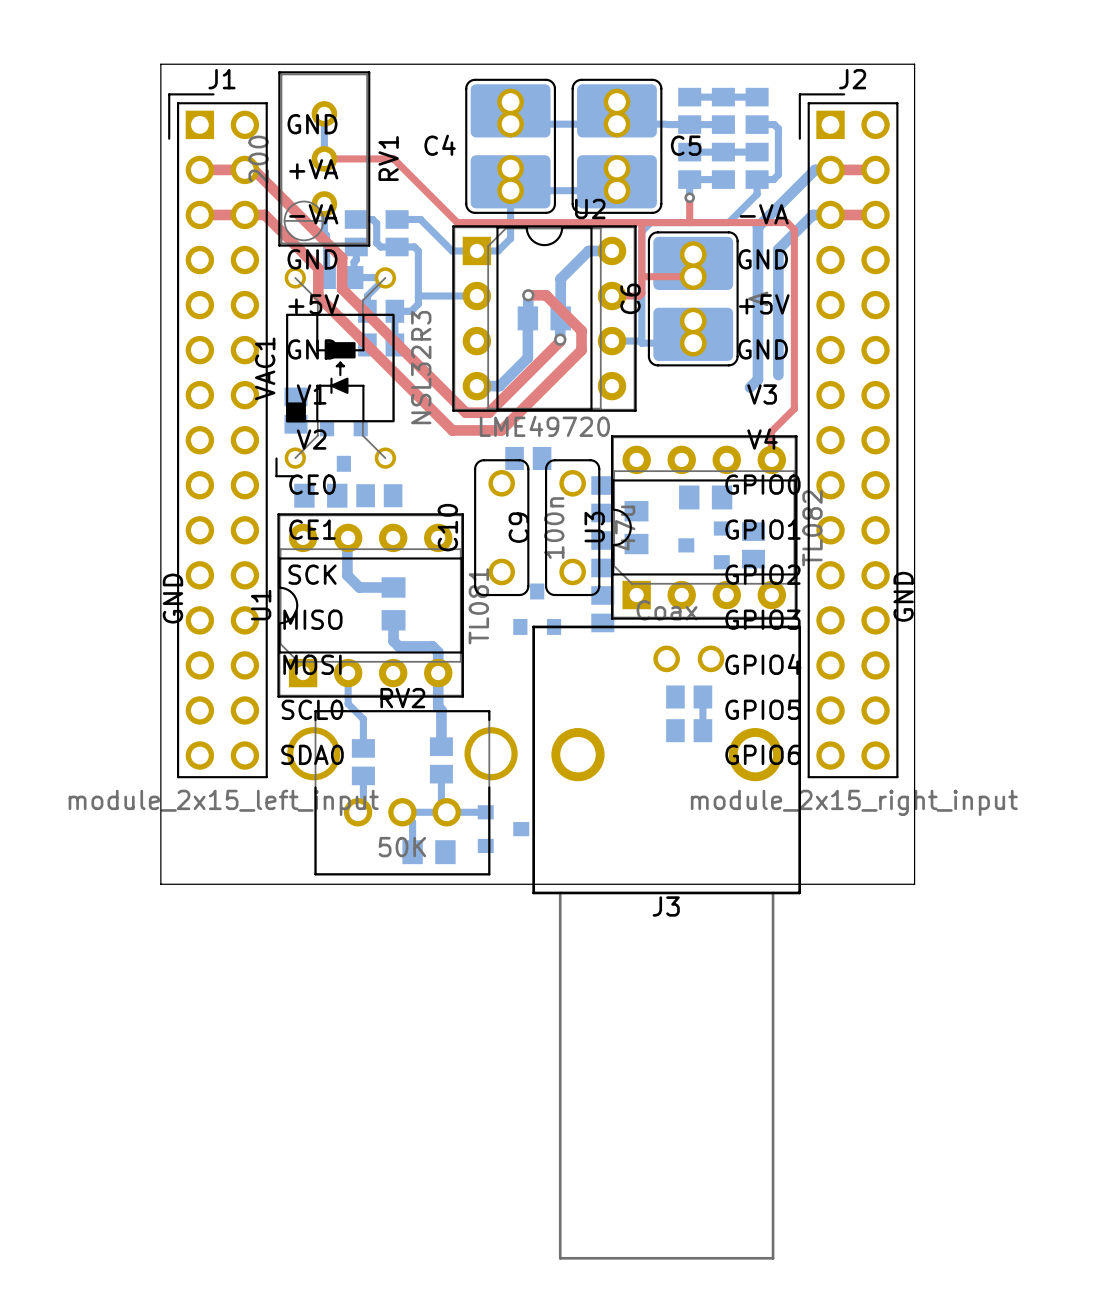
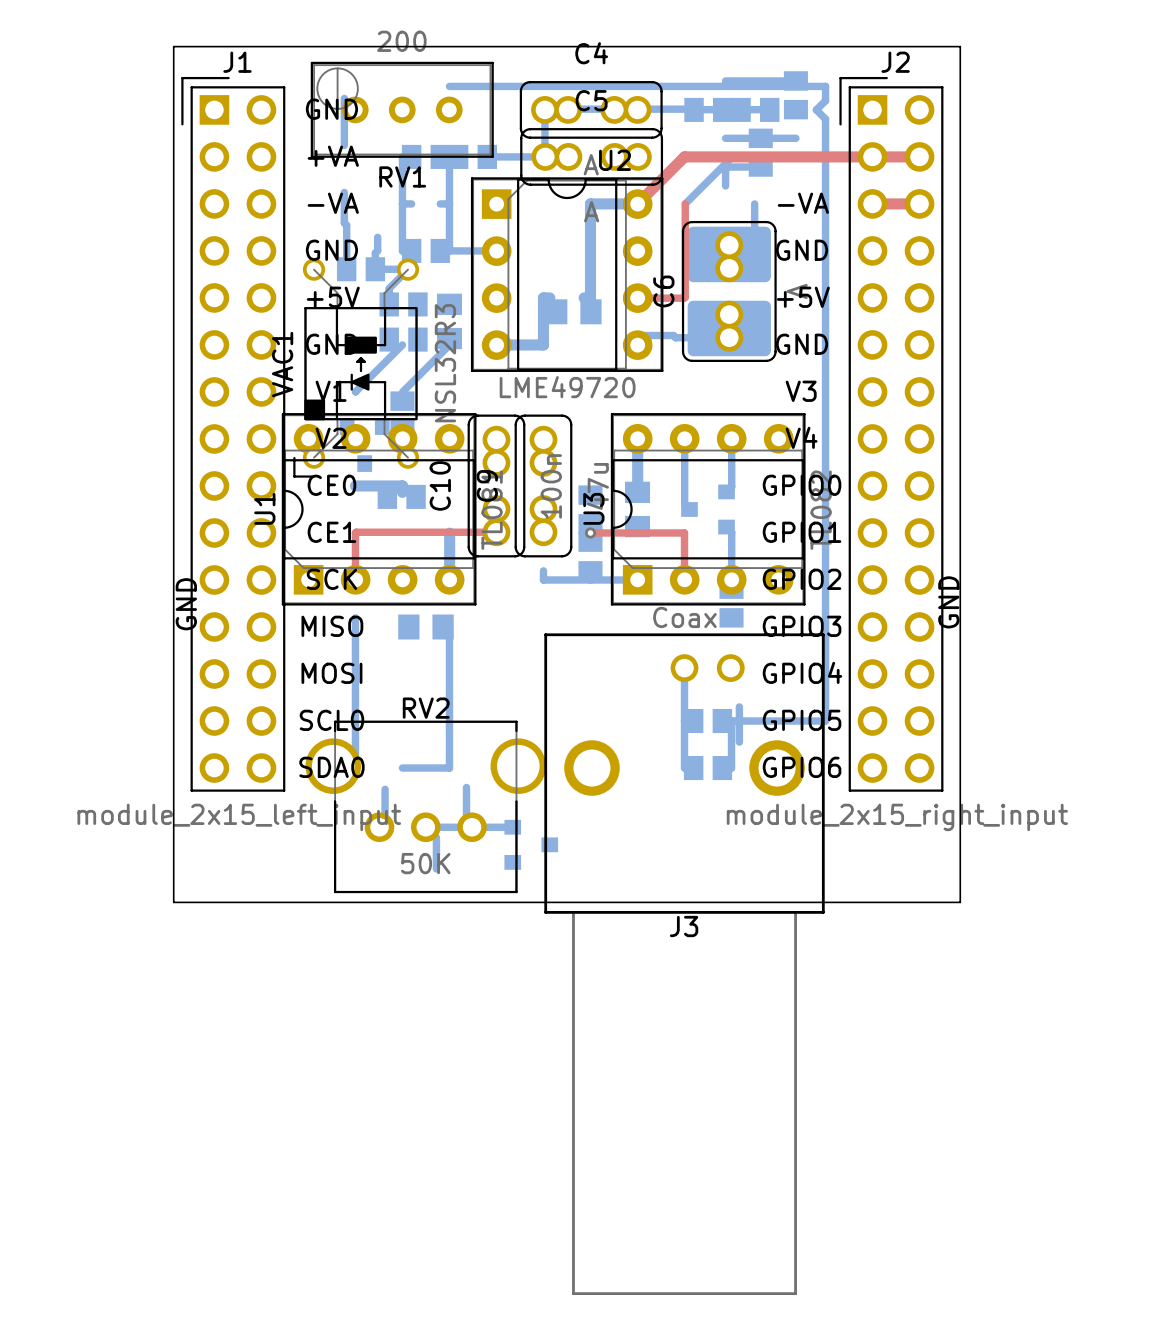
C4 footprint: [465, 78, 556, 214] -> [519, 81, 663, 139]
C5 footprint: [571, 78, 663, 214] -> [520, 128, 664, 186]
bottom track: none -> (449, 86) (825, 86) (825, 100) (816, 109) (825, 119) (825, 721) (722, 721)
part rotation: 0° (689, 110) -> 90° clockwise (708, 109)
part rotation: 0° (723, 110) -> 90° clockwise (755, 109)
bottom track: none -> (544, 109) (545, 156) (487, 156)
bottom track: (757, 124) (774, 124) (778, 128) (778, 174) (773, 179) (757, 179) (757, 194) (728, 222) (650, 222) (641, 231) (641, 343) -> none
C4 name position: C4 (440, 145) -> C4 (591, 53)
C5 name position: C5 (686, 145) -> C5 (591, 100)
top track: (324, 158) (393, 158) (457, 222) (787, 222) (794, 229) (794, 408) (771, 431) (771, 459) -> none
RV1 rotation: 0° (324, 158) -> 90° clockwise (402, 109)
part: (689, 165) -> none
part: (757, 165) -> none
top track: (199, 169) (253, 169) (342, 258) (342, 288) (465, 412) (488, 412) (560, 339) -> none
bottom track: none -> (402, 156) (402, 250) (411, 250)
part: none -> (425, 156)
bottom track: none -> (458, 156) (449, 166) (449, 250) (496, 250)
part: none -> (472, 156)
bottom track: none -> (732, 156) (685, 203)
top track: none -> (872, 156) (684, 156) (637, 204)
bottom track: (830, 169) (815, 169) (757, 227) (757, 379) (750, 387) -> none
C4 value: none -> A (591, 164)
bottom track: (617, 190) (510, 190) (510, 238) (498, 250) (452, 250) (420, 219) (397, 219) -> none
top track: (689, 197) (689, 222) -> none
via: (689, 197) -> none
top track: (199, 214) (264, 214) (318, 268) (318, 296) (452, 430) (501, 430) (581, 350) (581, 330) (546, 295) (528, 295) -> none
bottom track: none -> (402, 203) (411, 203)
bottom track: none -> (440, 203) (449, 203)
bottom track: none -> (637, 203) (590, 203) (590, 297) (584, 297)
top track: none -> (685, 203) (685, 297) (637, 298)
bottom track: none -> (754, 203) (755, 250)
bottom track: (830, 214) (812, 214) (778, 249) (778, 375) -> none
bottom track: (356, 219) (372, 219) (376, 223) (376, 242) (380, 246) (414, 246) (418, 250) (418, 304) (411, 311) (394, 311) (394, 344) -> none
C5 value: none -> A (591, 211)
top track: (641, 222) (641, 293) (639, 296) (612, 296) -> none
part: (356, 233) -> none
part: (397, 233) -> none
bottom track: (612, 250) (588, 250) (560, 278) (560, 339) -> none
part: none -> (425, 250)
top track: (693, 276) (641, 277) -> none
bottom track: (528, 295) (527, 357) (499, 386) (476, 386) -> none
via: (528, 295) -> none
bottom track: (476, 296) (418, 297) -> none
bottom track: none -> (549, 297) (543, 297) (543, 344) (496, 344)
U2 position: (544, 318) -> (567, 274)
part: none -> (449, 321)
via: (560, 339) -> none
bottom track: none -> (449, 338) (449, 345) (402, 391)
bottom track: none -> (402, 344) (355, 391)
part: (296, 410) -> none
part: none -> (402, 415)
bottom track: none -> (637, 438) (637, 492)
bottom track: none -> (684, 438) (684, 504) (689, 509)
bottom track: none -> (731, 438) (731, 486) (726, 491)
part: (528, 458) -> none
C10 footprint: [474, 459, 530, 597] -> [467, 414, 526, 558]
C9 footprint: [544, 459, 601, 597] -> [514, 414, 573, 558]
part footprint: [591, 476, 615, 523] -> [625, 481, 650, 538]
bottom track: none -> (355, 485) (402, 485) (402, 492)
part: (320, 495) -> none
part: (705, 497) -> none
part: none -> (590, 509)
bottom track: none -> (726, 527) (731, 532) (731, 579)
part: (636, 527) -> none
U3 position: (704, 527) -> (708, 509)
top track: none -> (496, 532) (356, 532) (355, 579)
bottom track: none -> (449, 533) (449, 579)
top track: none -> (590, 532) (684, 532) (684, 579)
via: none -> (590, 532)
bottom track: (348, 537) (347, 575) (359, 587) (393, 587) -> none
part position: (704, 545) -> (708, 509)
part: (753, 545) -> none
part: none -> (590, 556)
part: (602, 554) -> none
bottom track: none -> (543, 570) (543, 579) (637, 579)
part: none -> (731, 603)
part rotation: 0° (393, 603) -> 90° clockwise (425, 627)
U1 position: (370, 605) -> (379, 509)
part: (537, 609) -> none
part: (602, 609) -> none
bottom track: none -> (355, 617) (355, 768)
bottom track: (393, 620) (393, 641) (398, 646) (432, 646) (438, 652) (438, 707) (441, 710) (441, 746) -> none
bottom track: none -> (449, 627) (449, 768) (402, 768)
bottom track: none -> (684, 668) (684, 768) (693, 768)
bottom track: (348, 673) (348, 703) (363, 719) (363, 748) -> none
part: (689, 697) -> none
part: none -> (708, 721)
bottom track: none -> (731, 721) (731, 768) (722, 768)
part: (689, 730) -> none
part: none -> (708, 768)
part: (441, 760) -> none
part: (363, 762) -> none
part: (429, 852) -> none
J3 position: (666, 942) -> (684, 964)

